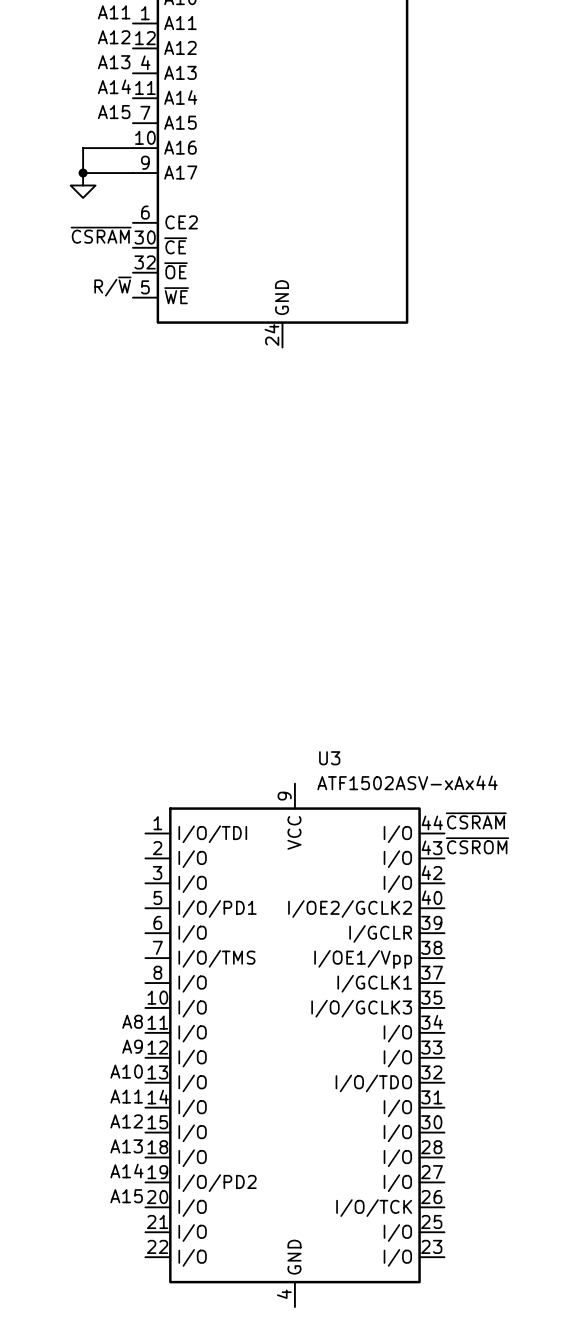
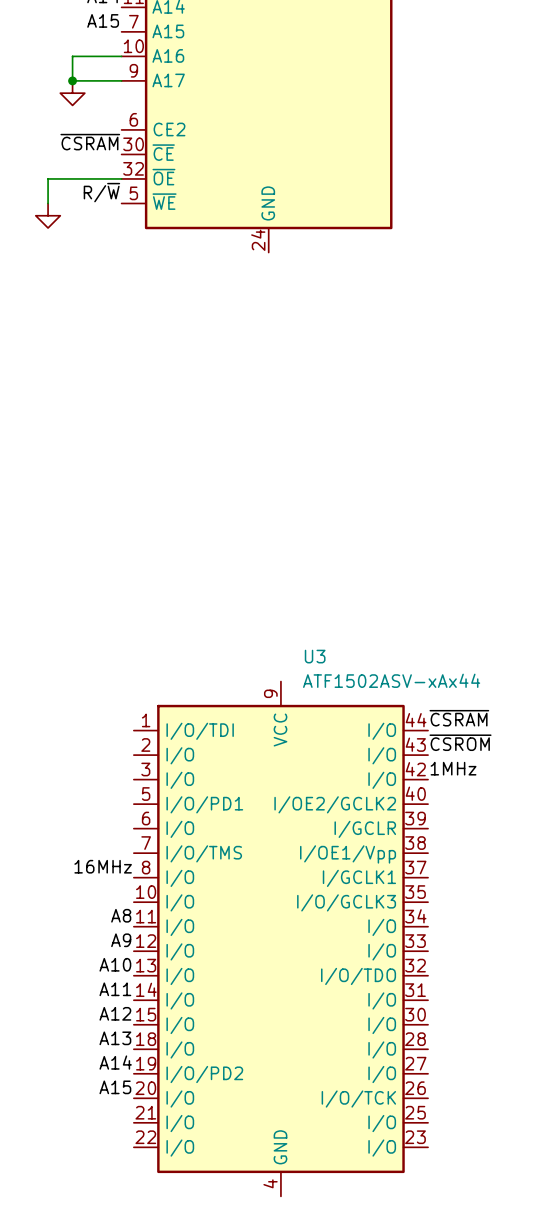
wire: none -> (121, 178) (48, 178) (48, 203)
power symbol: none -> (48, 215)
label: none -> 1MHz (453, 768)
label: none -> 16MHz (103, 866)

